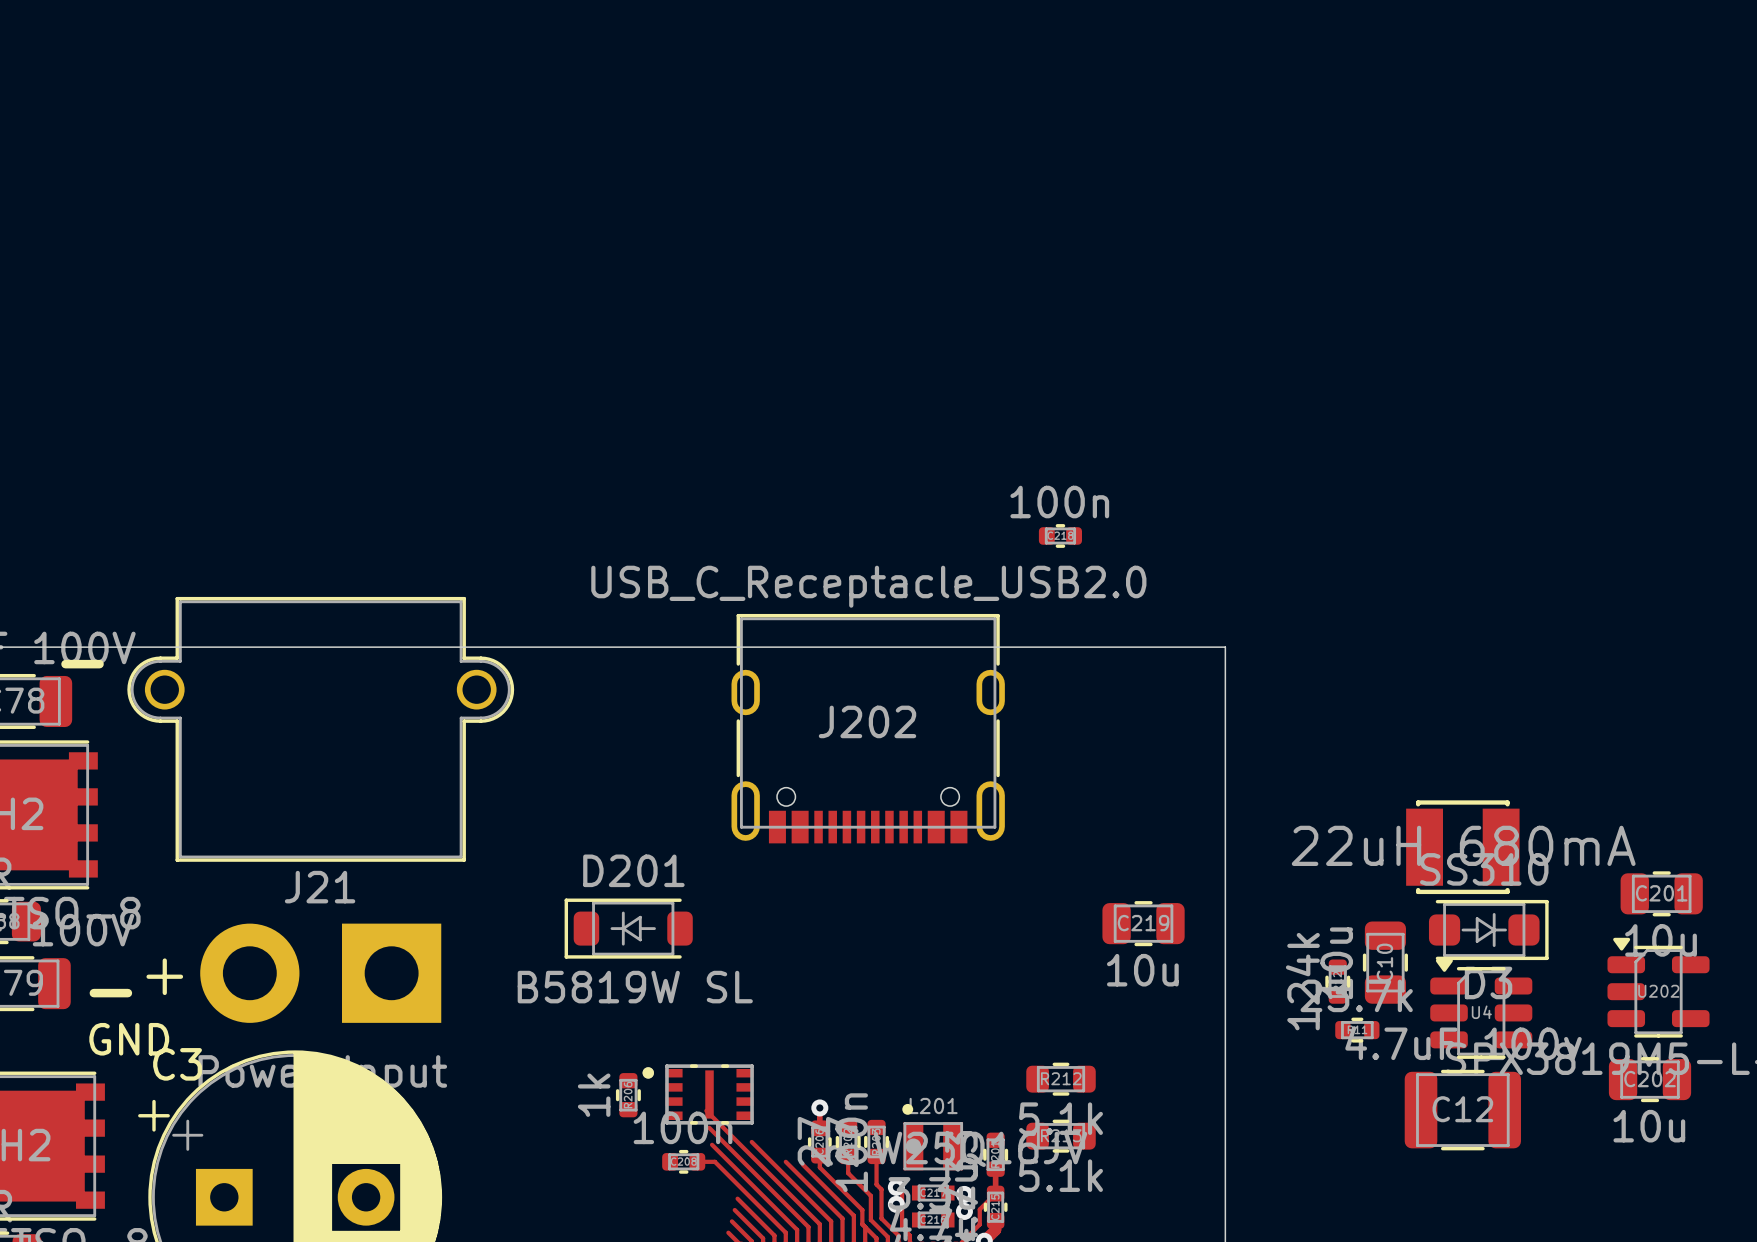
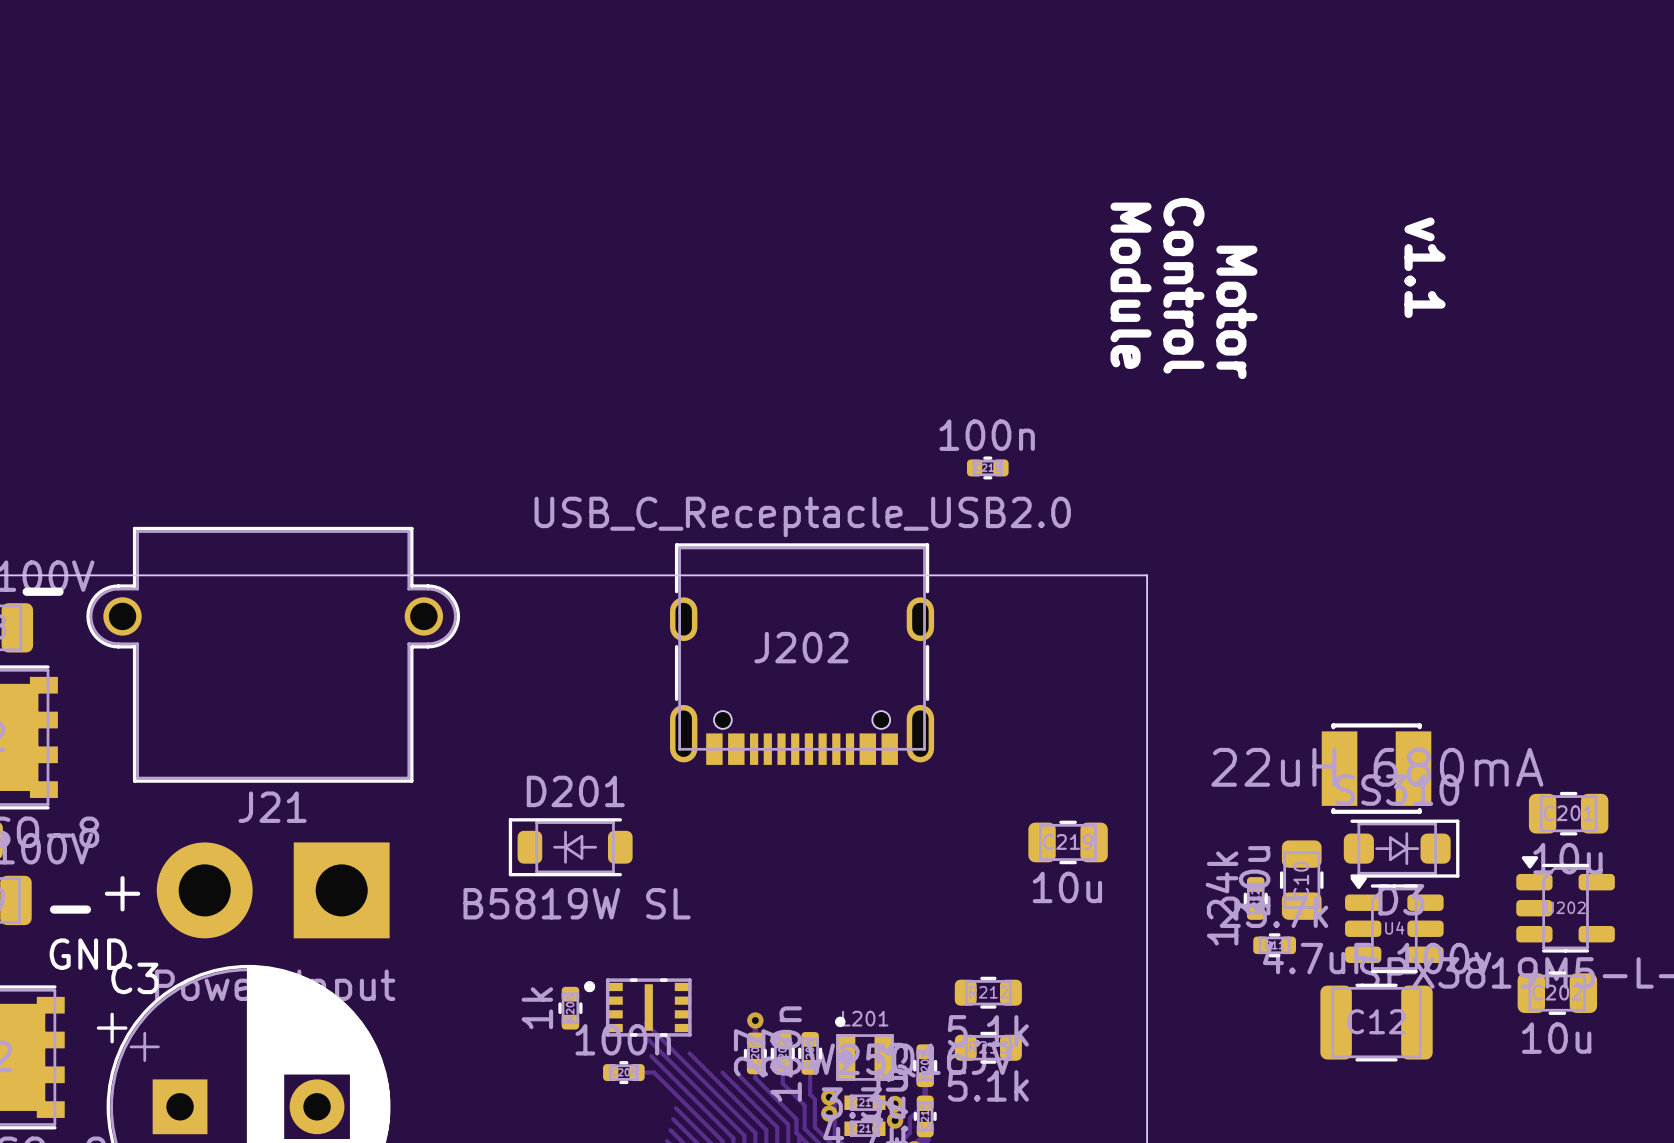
text: none -> v1.1 (1425, 267)
text: none -> Module (1131, 285)
text: none -> Control (1183, 285)
text: none -> Motor (1236, 312)

